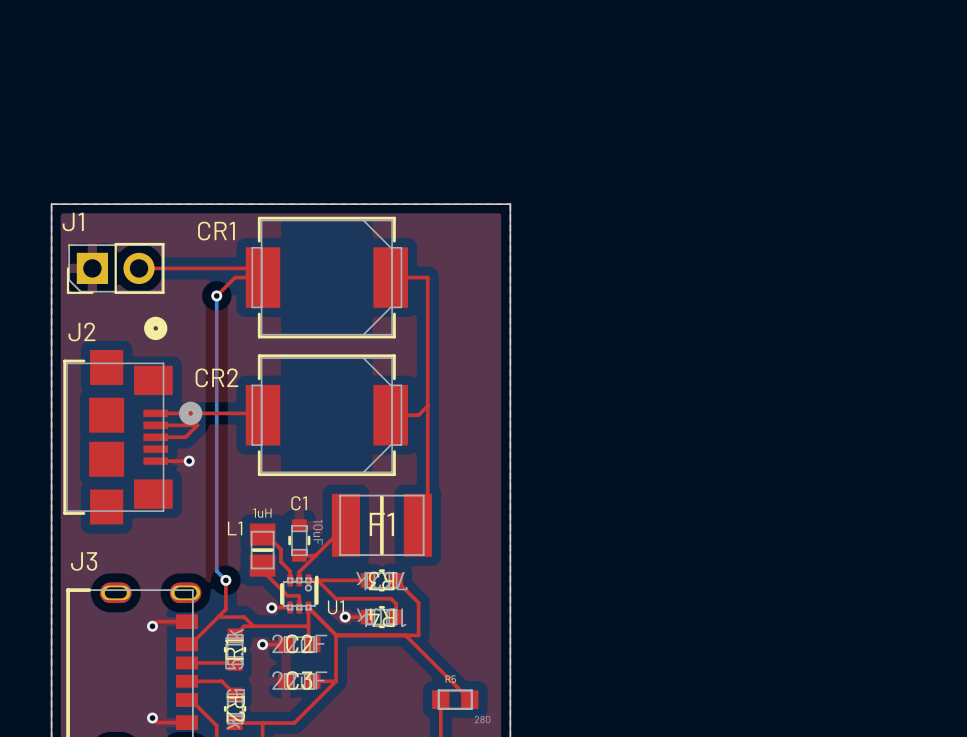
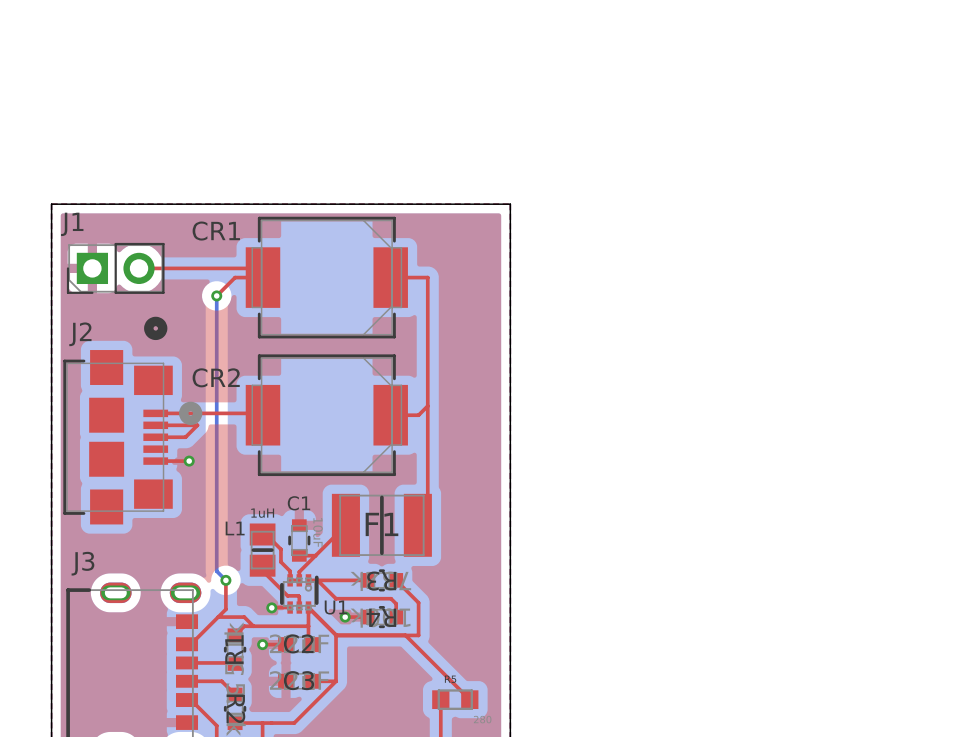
top track: (187, 621) (157, 621) (152, 626) -> none
via: (152, 626) -> none
top track: (152, 718) (157, 722) (187, 722) -> none
via: (152, 718) -> none

